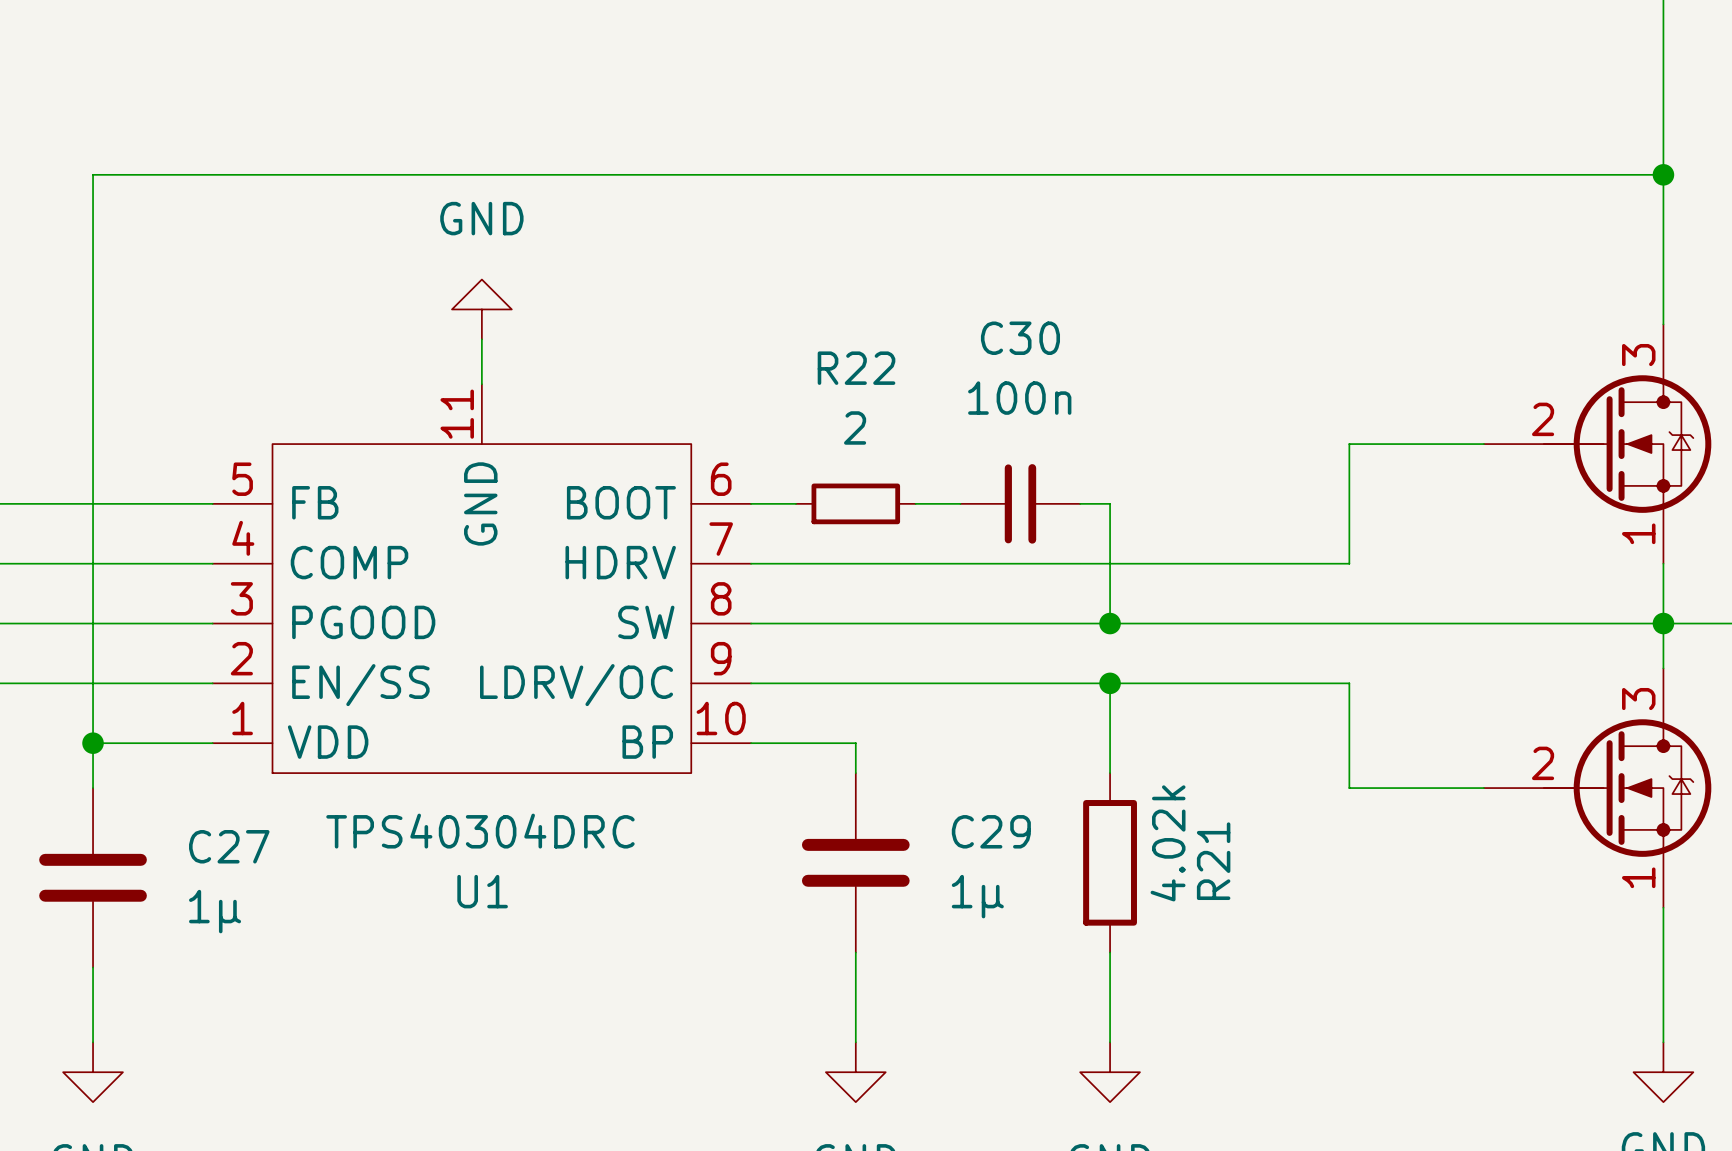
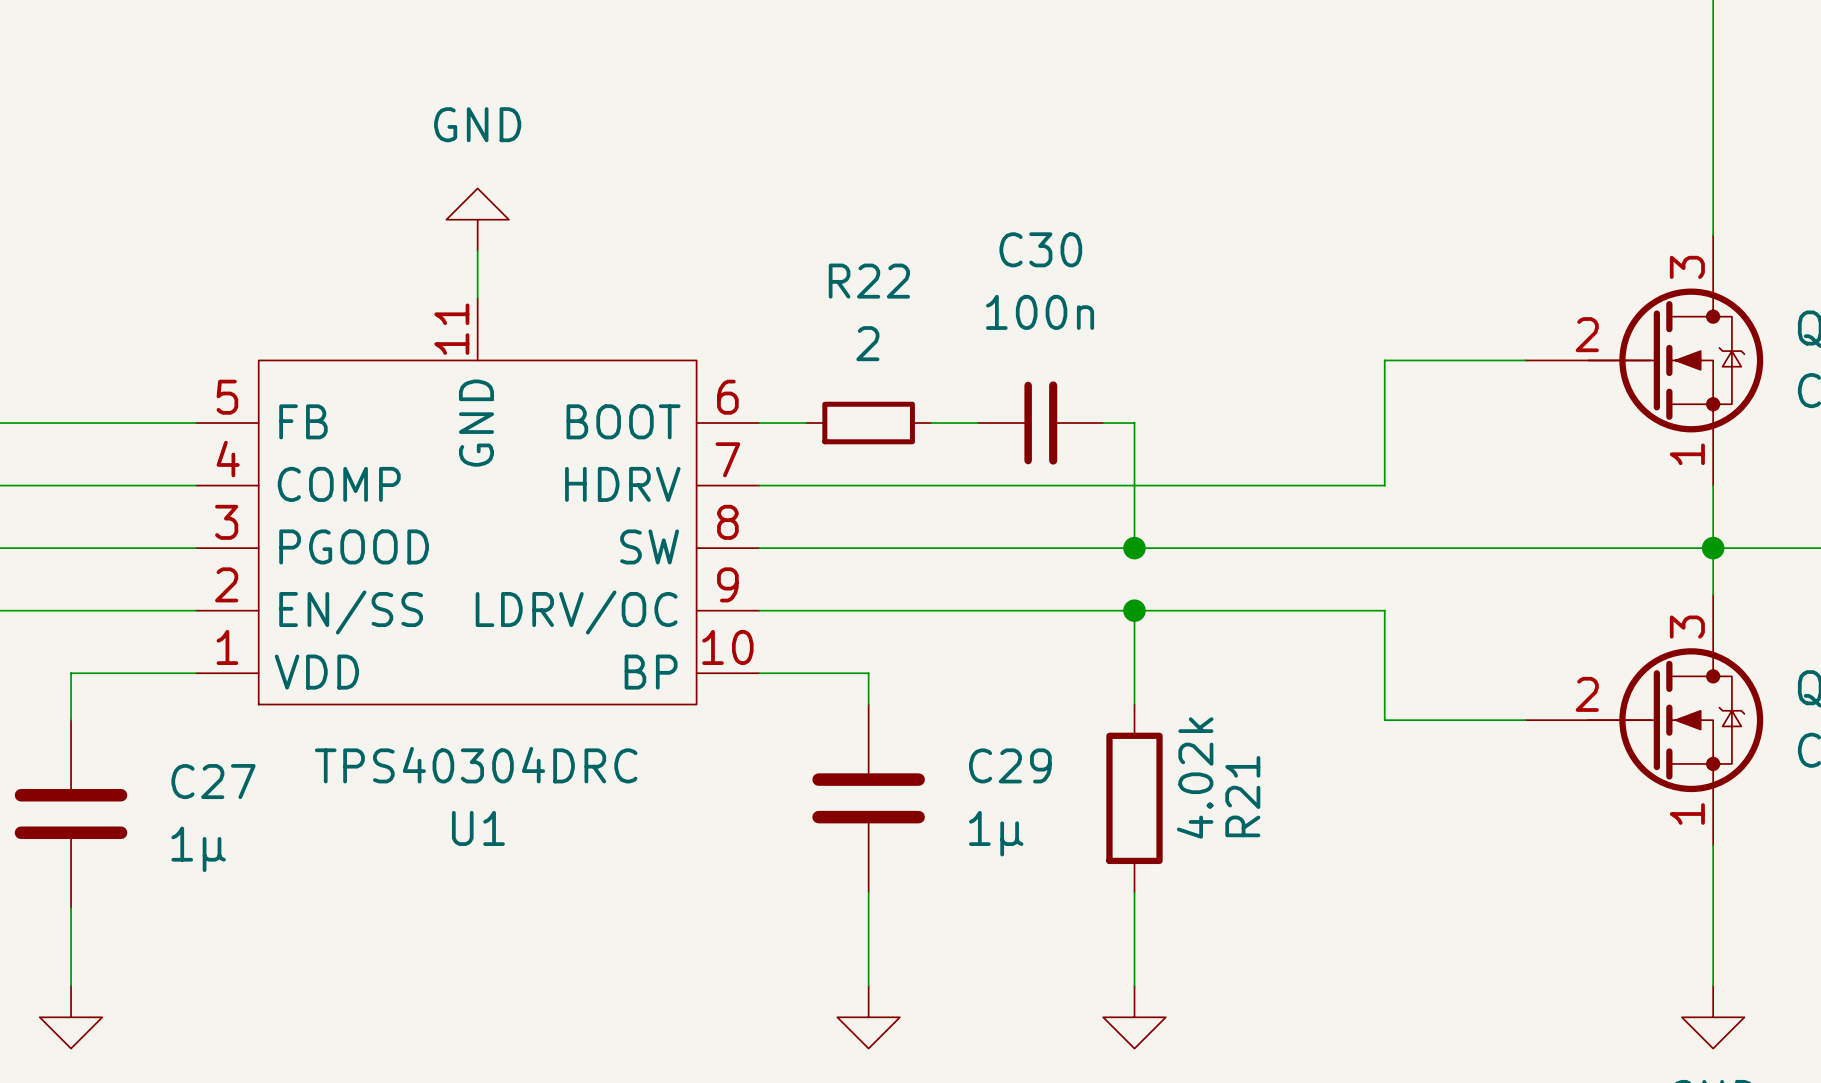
wire: (1663, 174) (93, 174) (93, 743) -> none
junction: (1663, 174) -> none
junction: (93, 743) -> none

